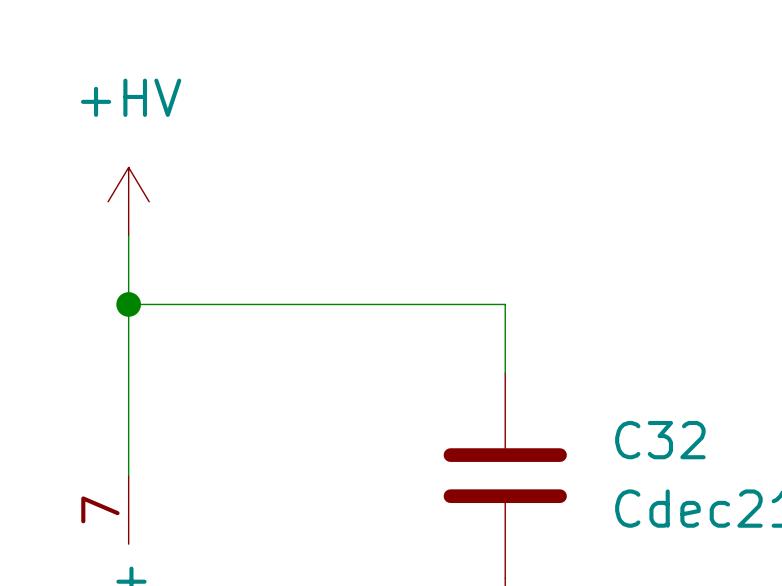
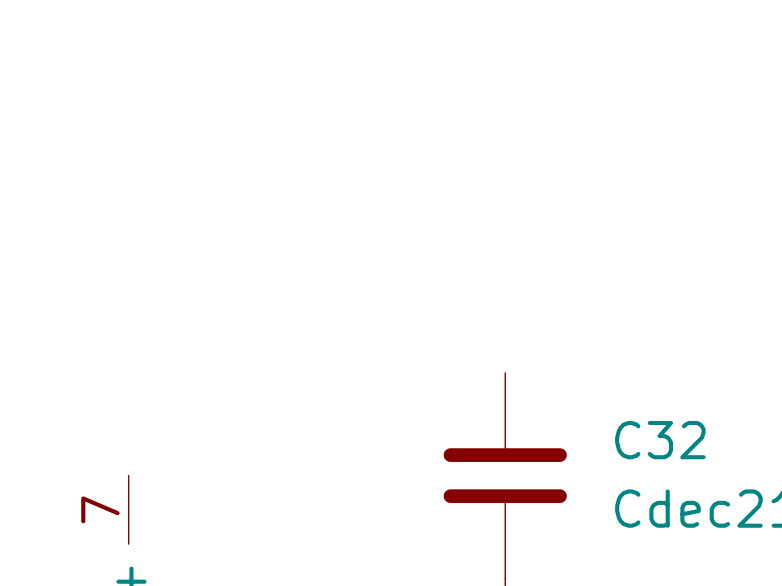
power symbol: +HV (128, 201) -> none
wire: (128, 235) (128, 475) -> none
wire: (128, 304) (505, 304) (505, 372) -> none
junction: (128, 304) -> none

